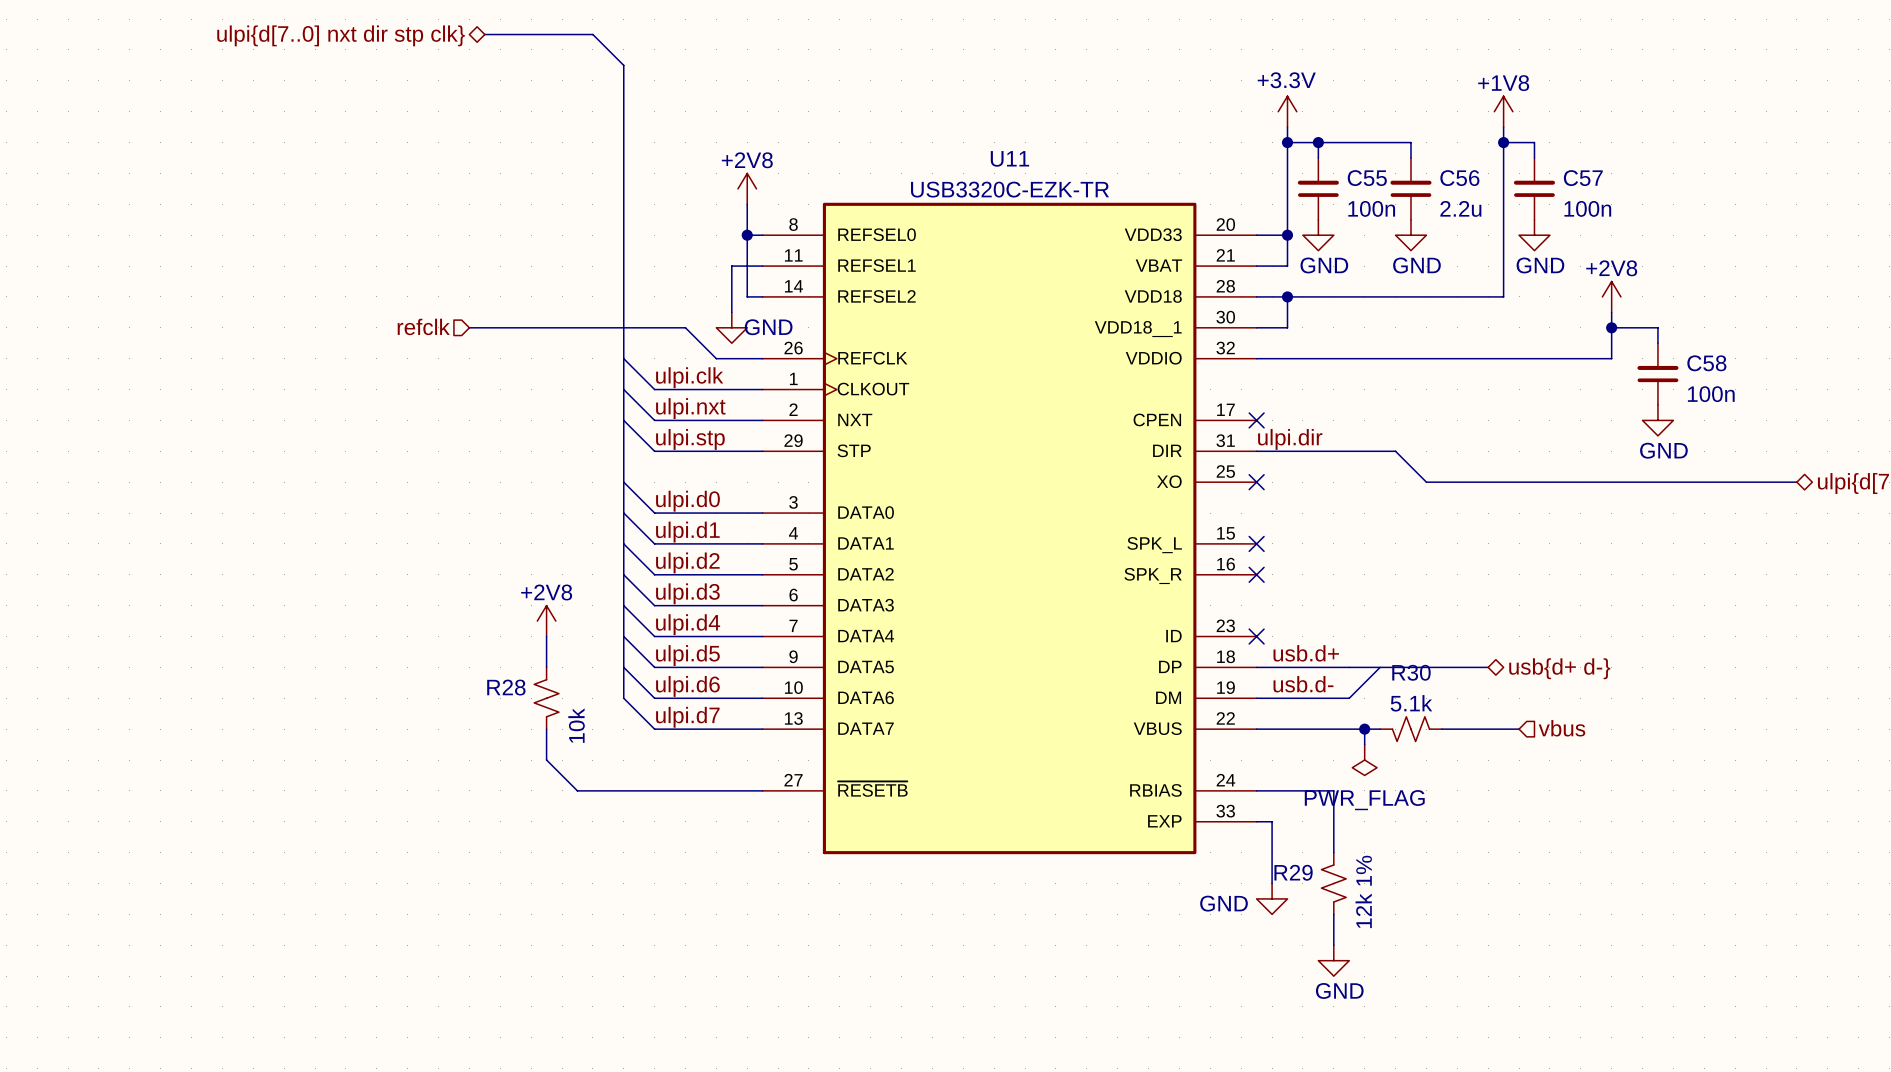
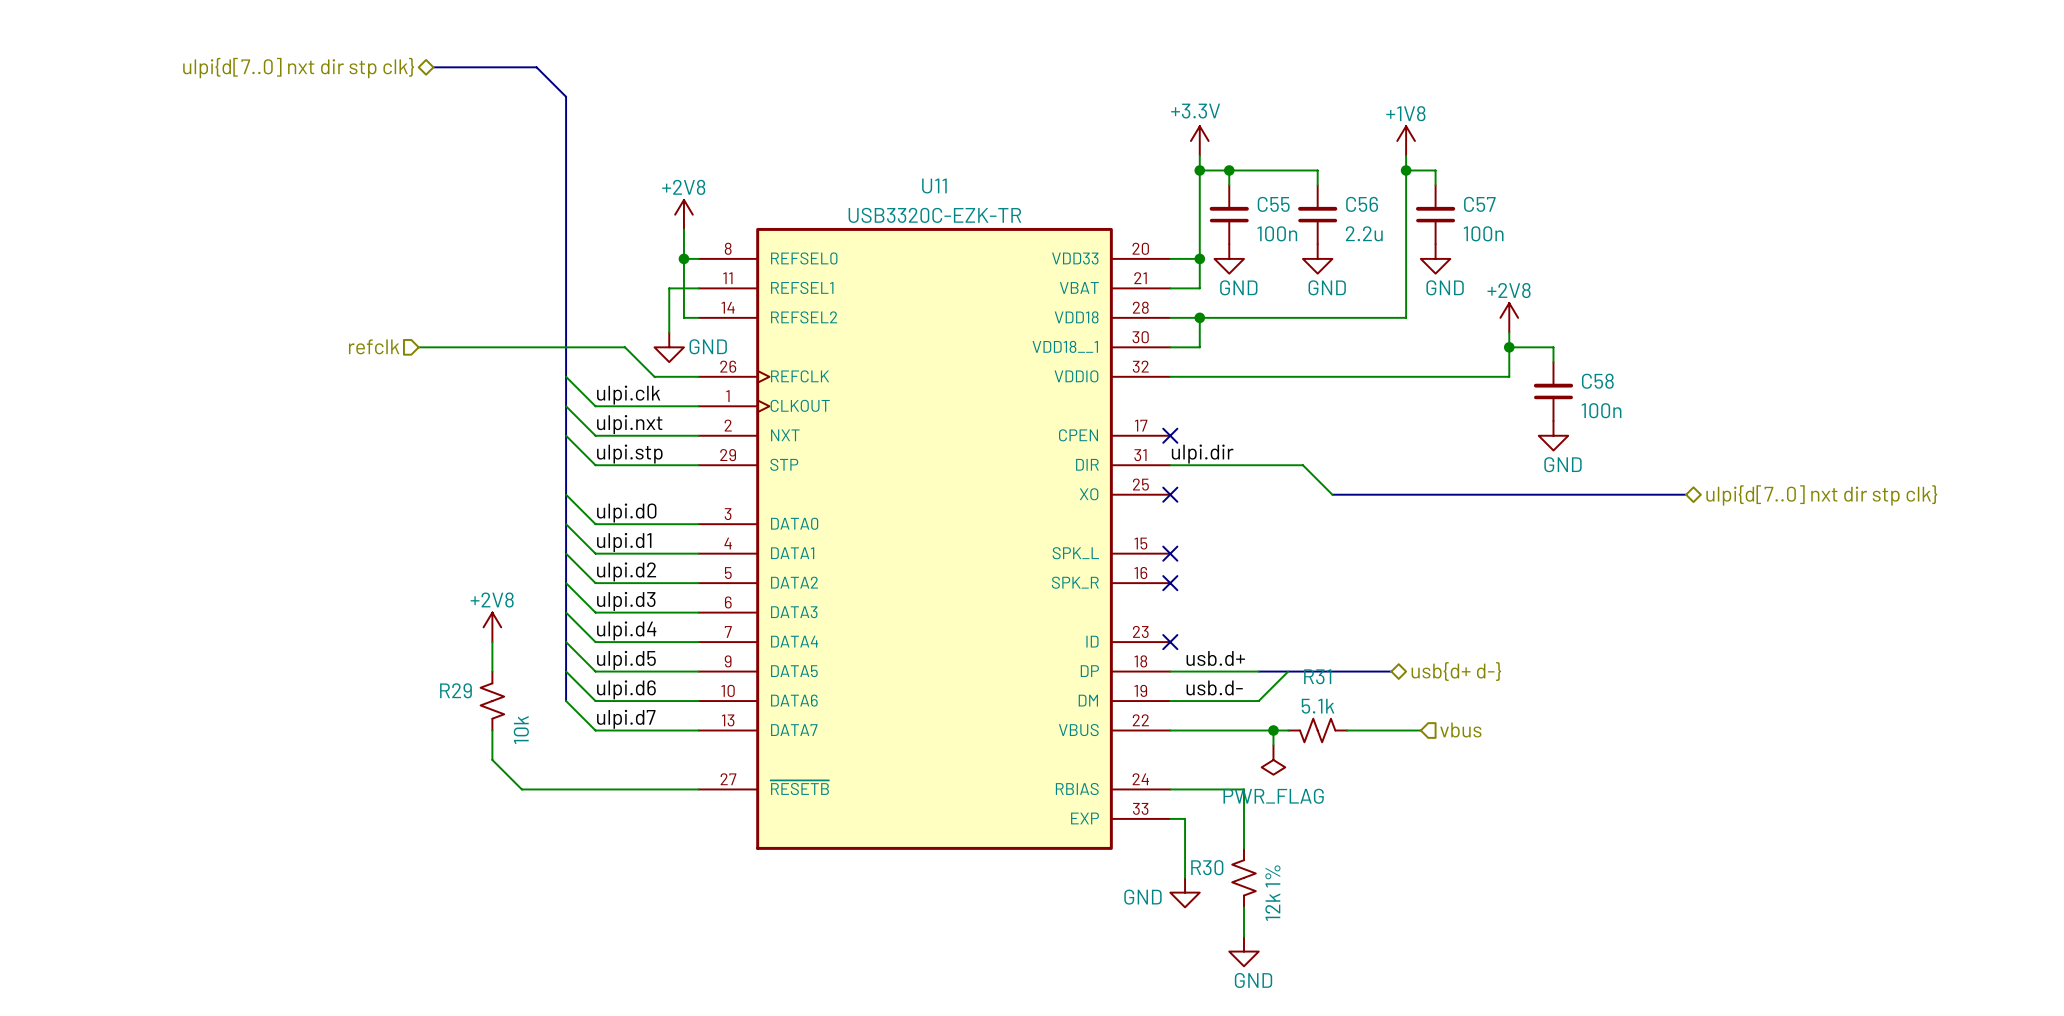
R30 name: R30 (1411, 672) -> R31 (1317, 676)
R28 name: R28 (506, 687) -> R29 (455, 690)
R29 name: R29 (1293, 872) -> R30 (1207, 867)

